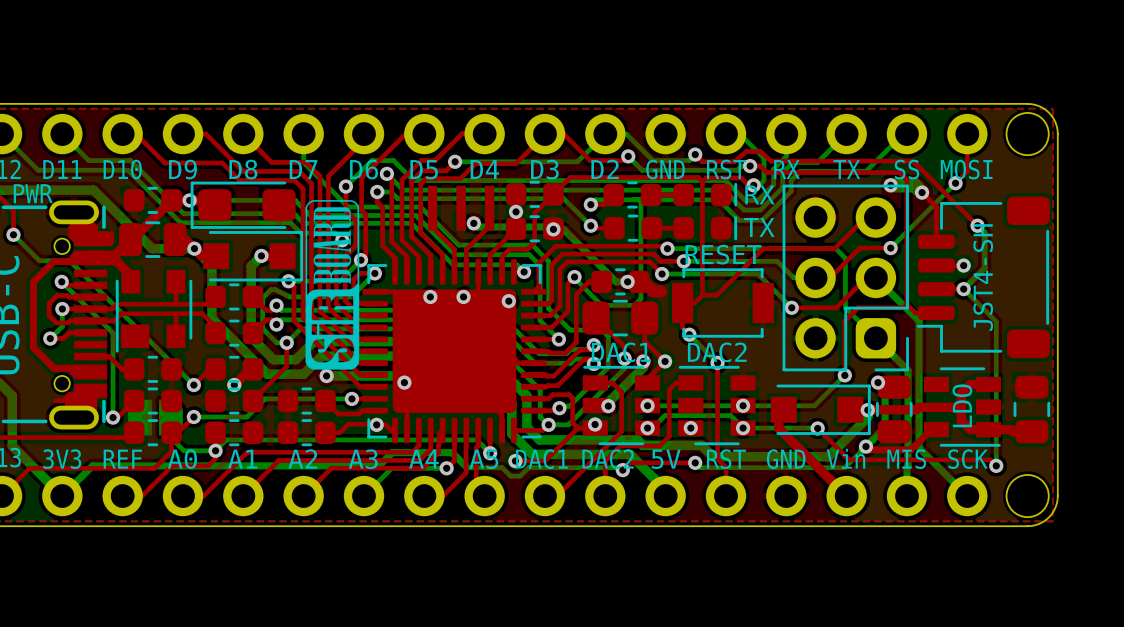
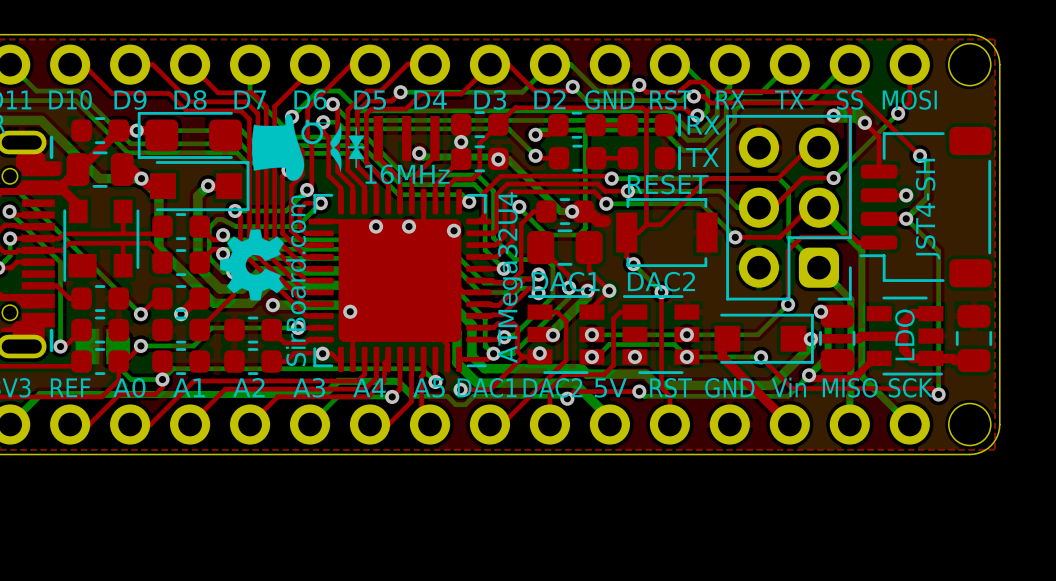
drawing: none -> [252, 114, 365, 181]
drawing: [305, 199, 360, 370] -> none
text: none -> 16MHz (407, 174)
drawing: none -> [219, 229, 285, 301]
text: none -> ATMega32U4 (510, 277)
text: none -> SirBoard.com (295, 280)
text: MIS (906, 459) -> MISO (850, 387)

